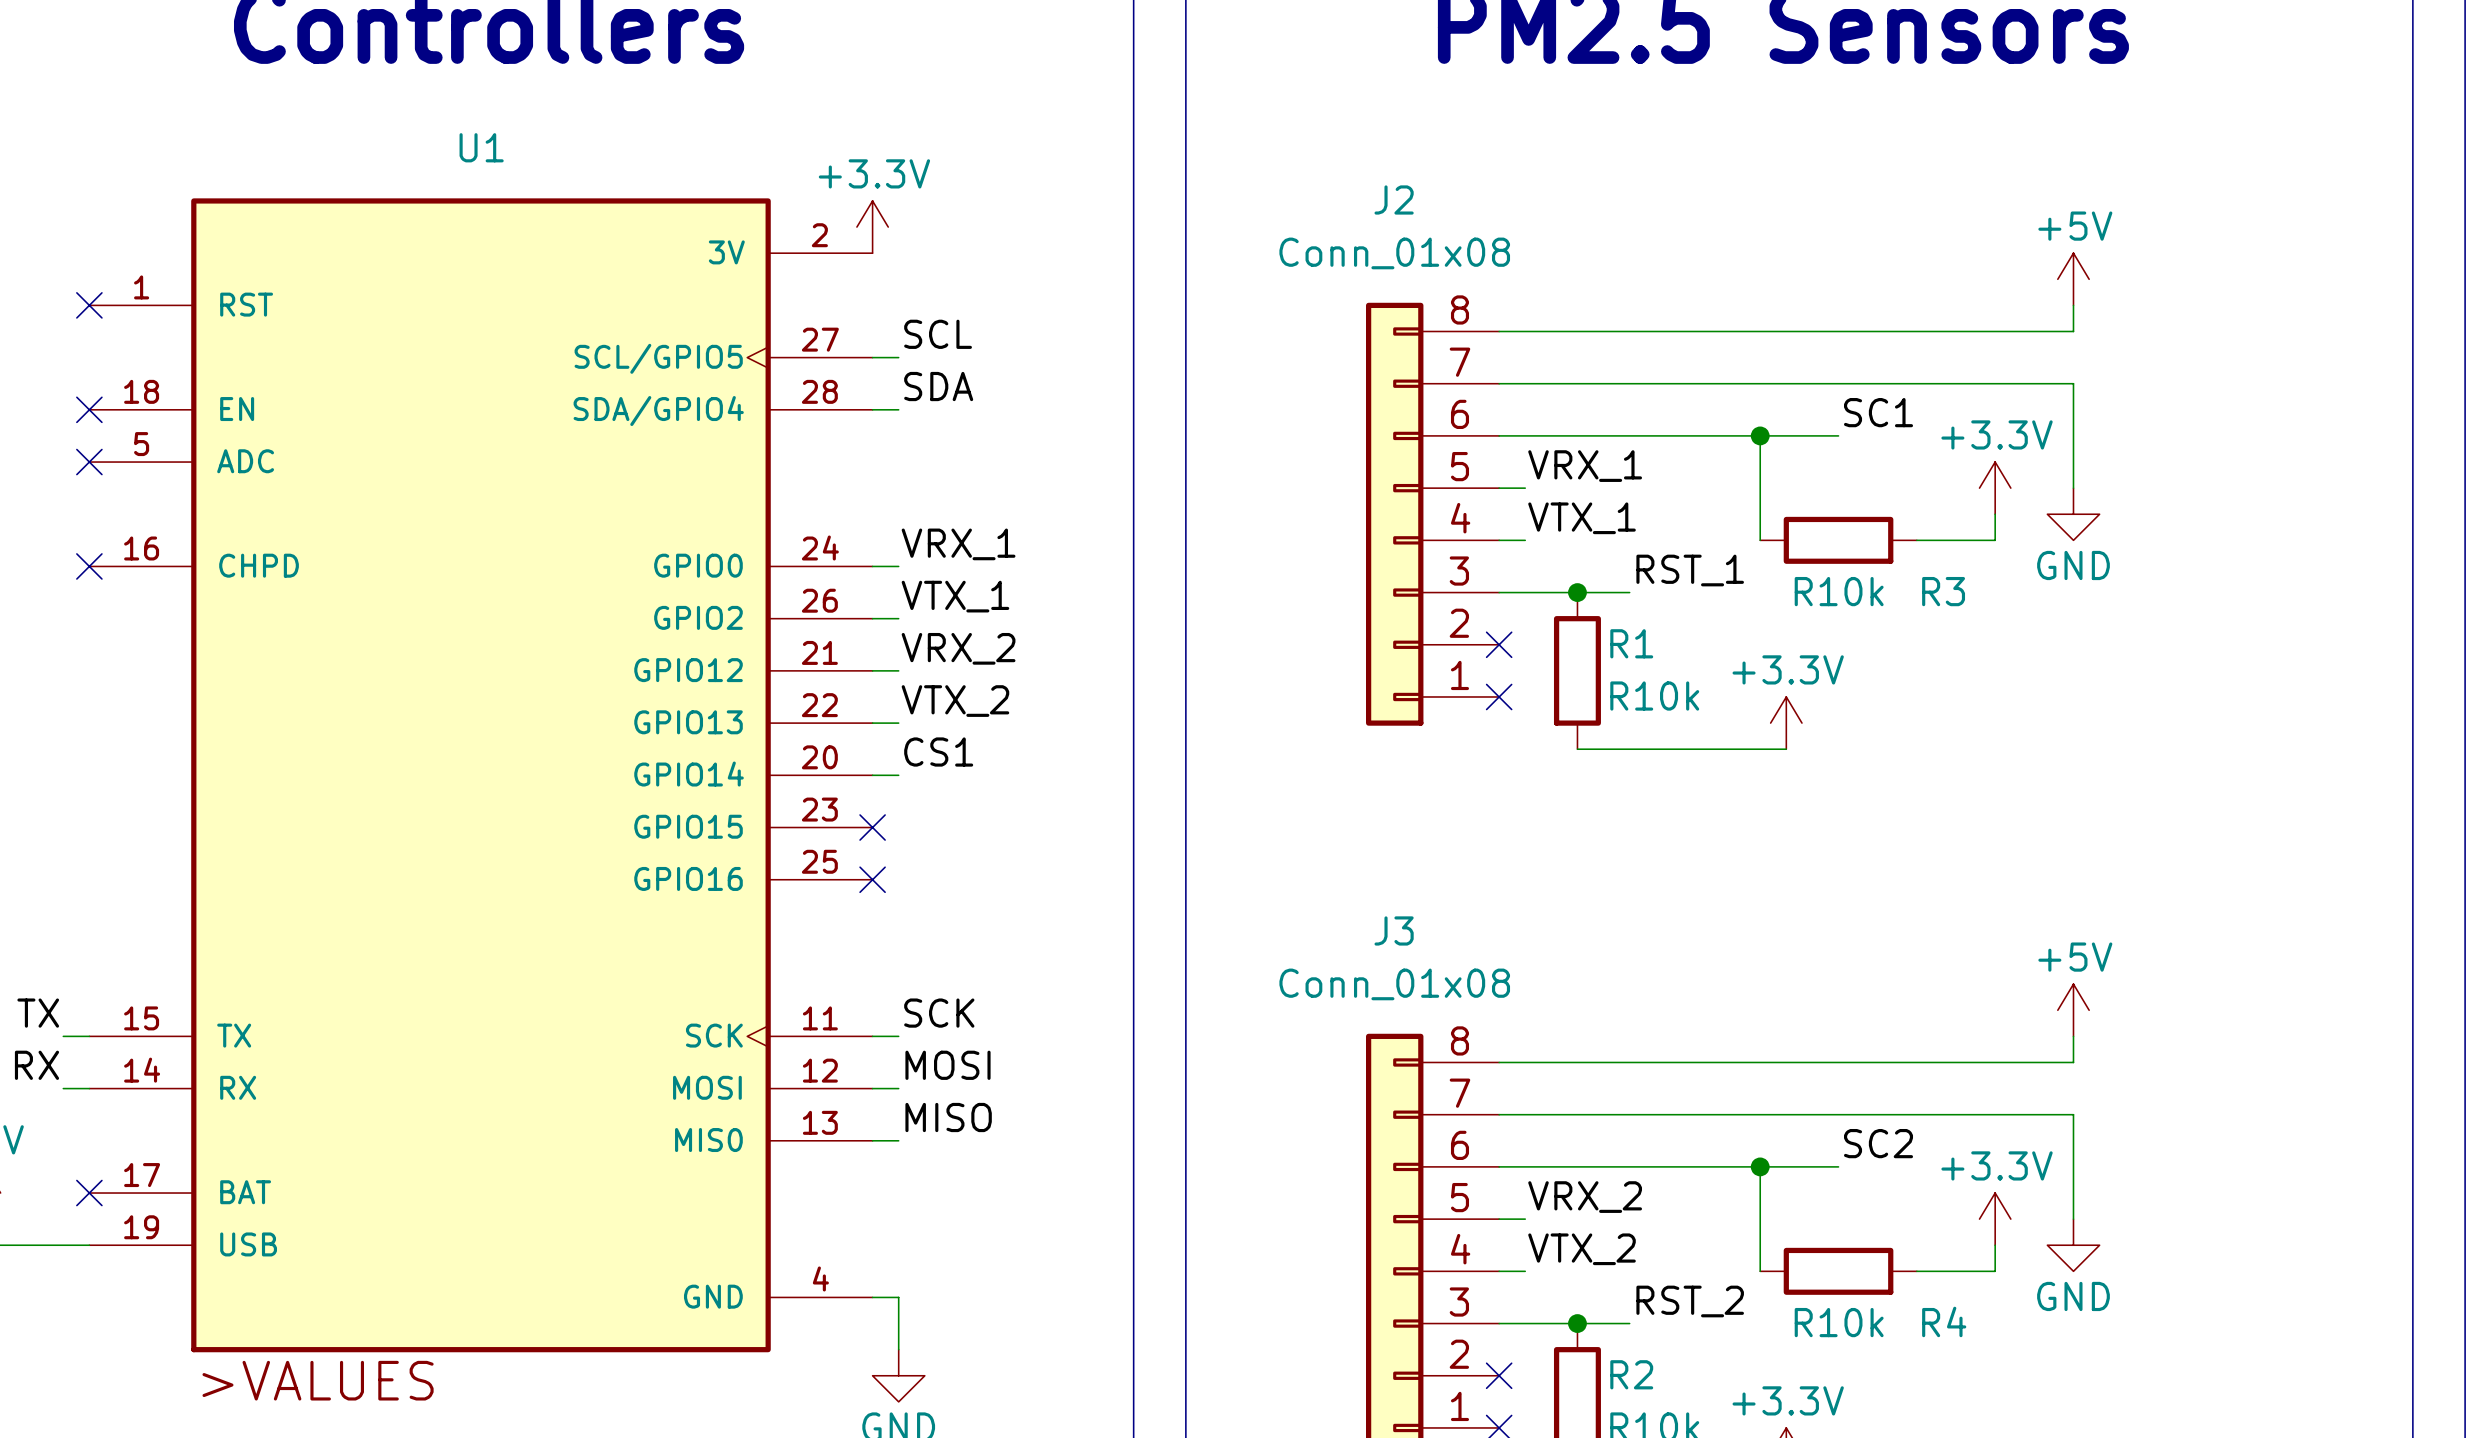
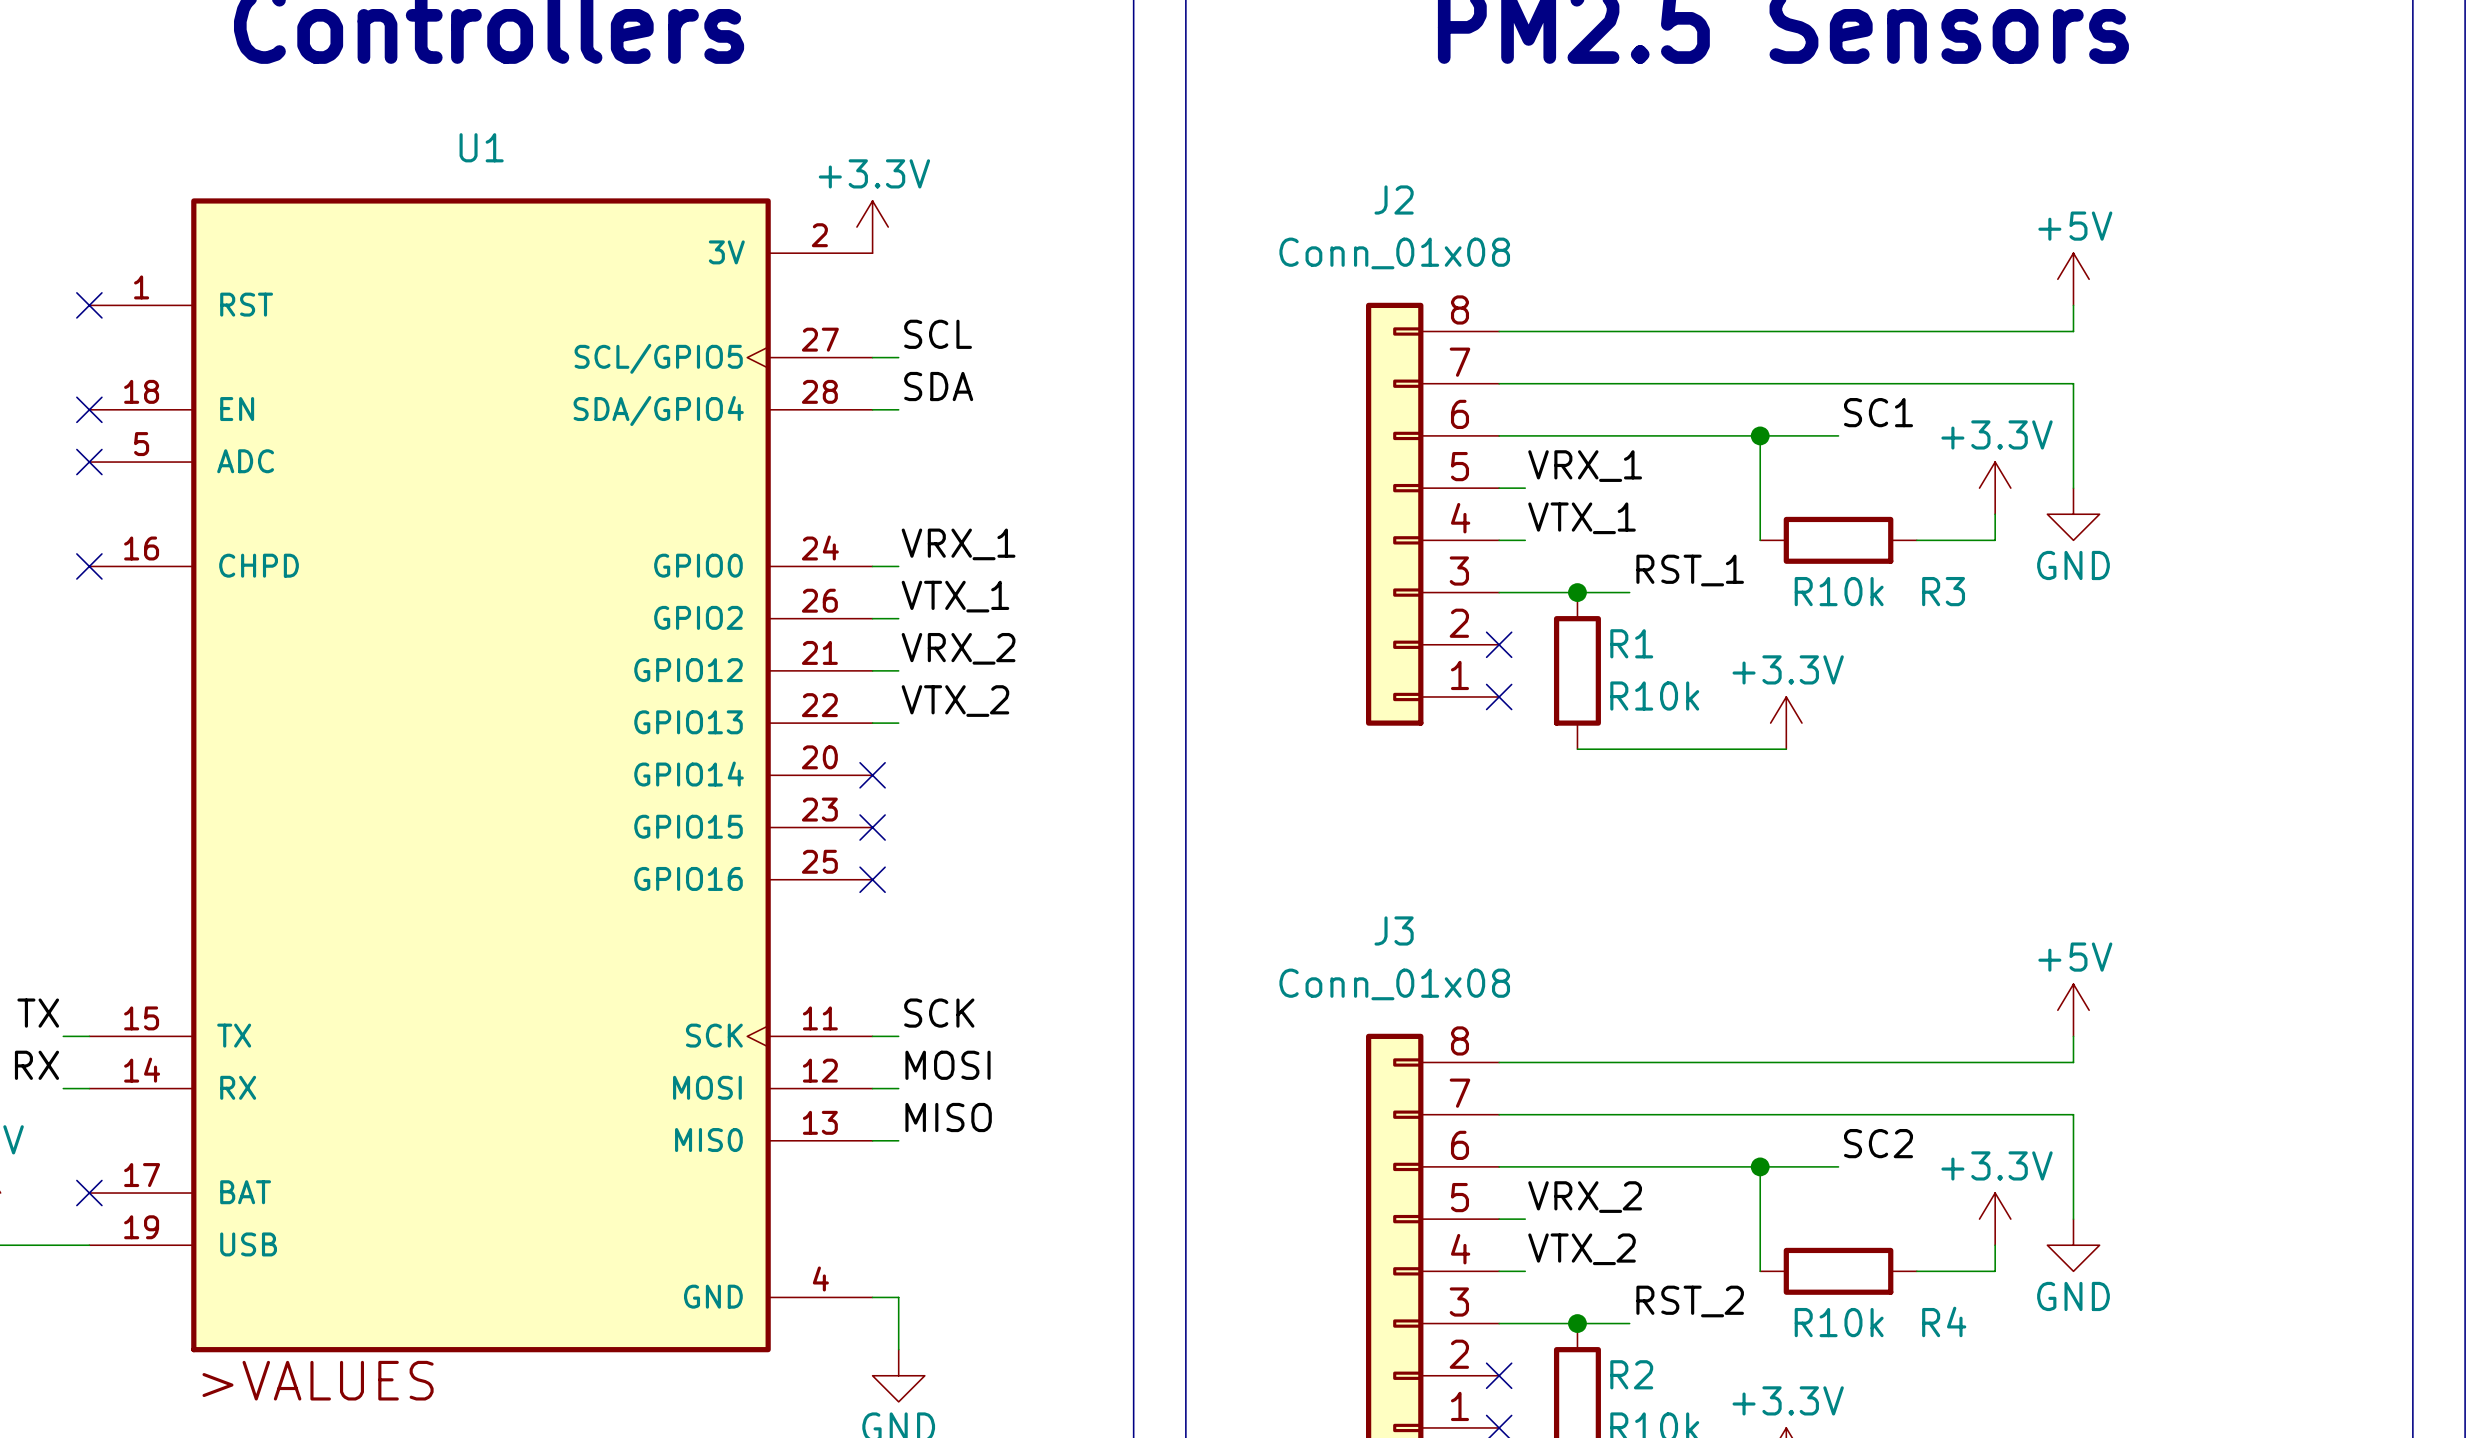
label: CS1 (938, 752) -> none
wire: (872, 775) (898, 775) -> none
no-connect mark: none -> (872, 775)

